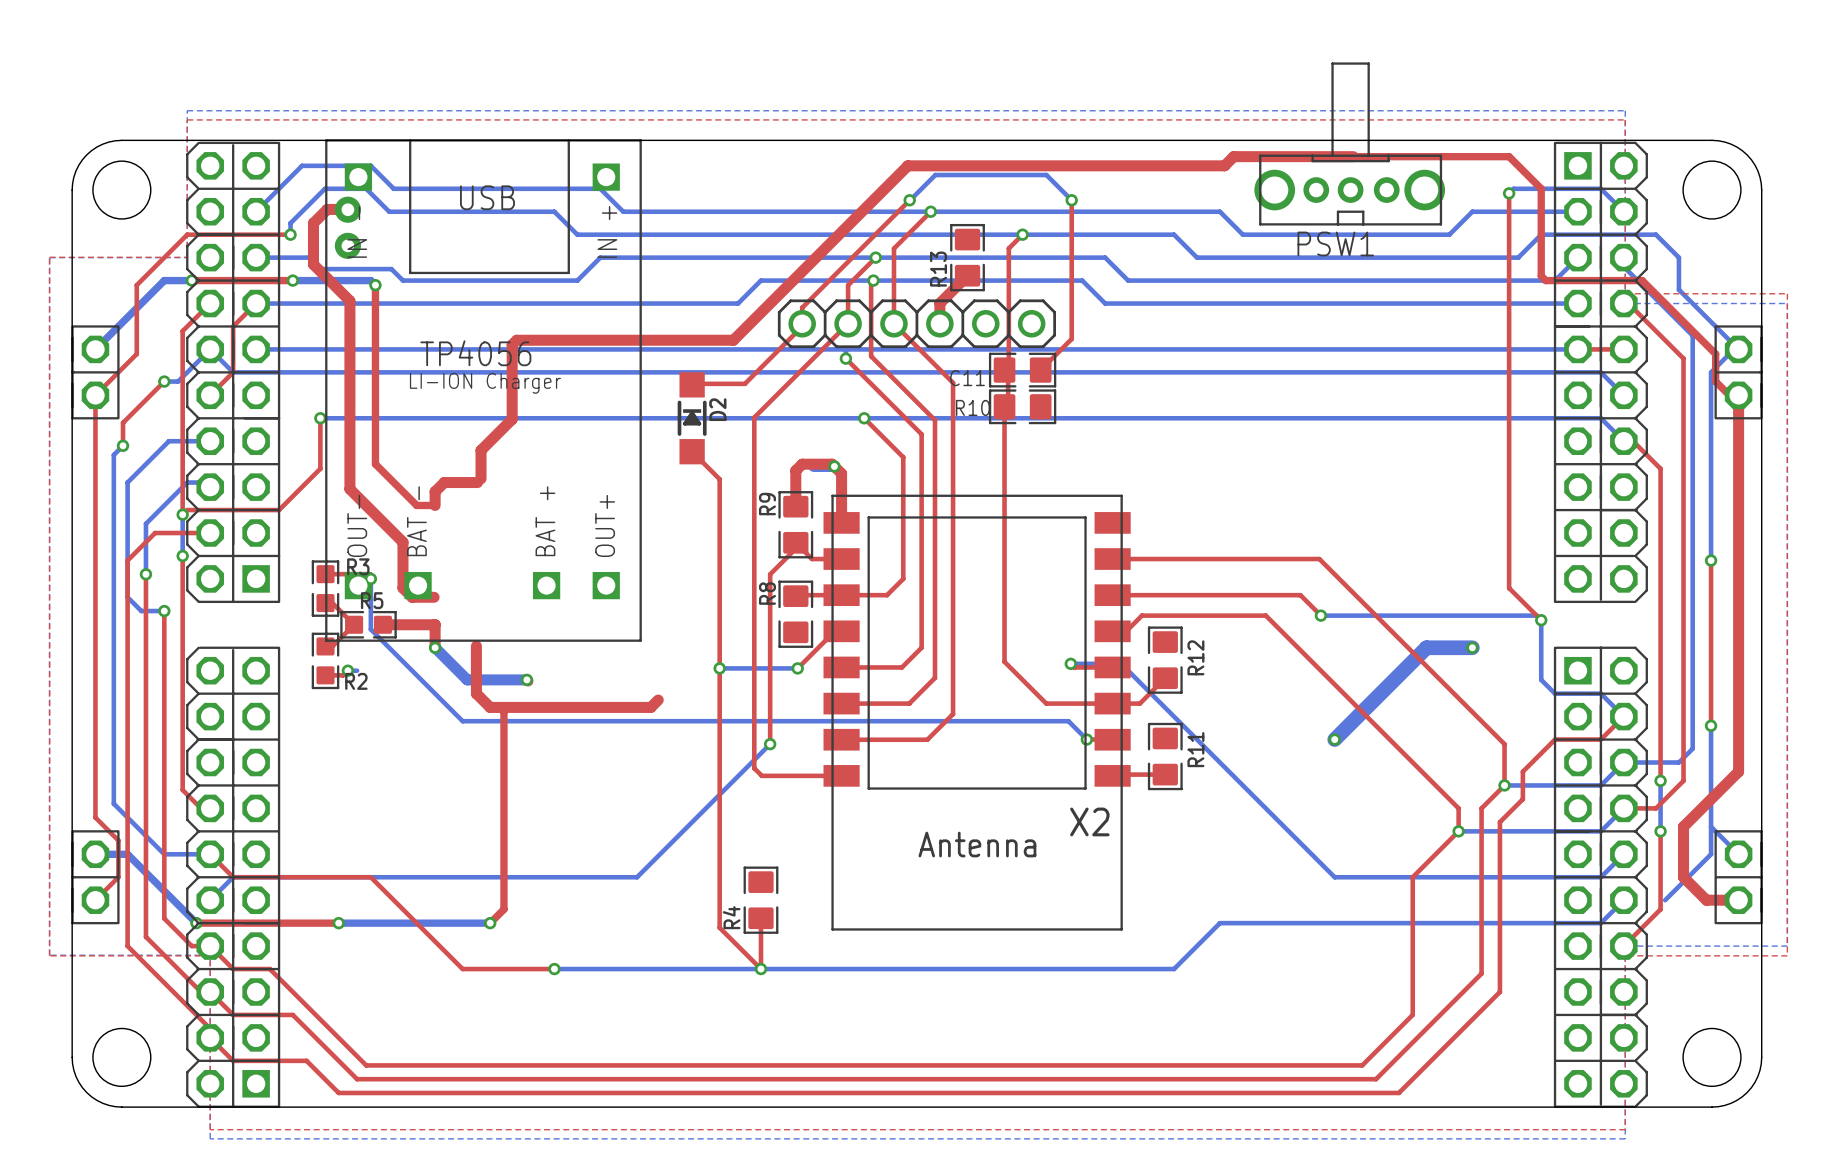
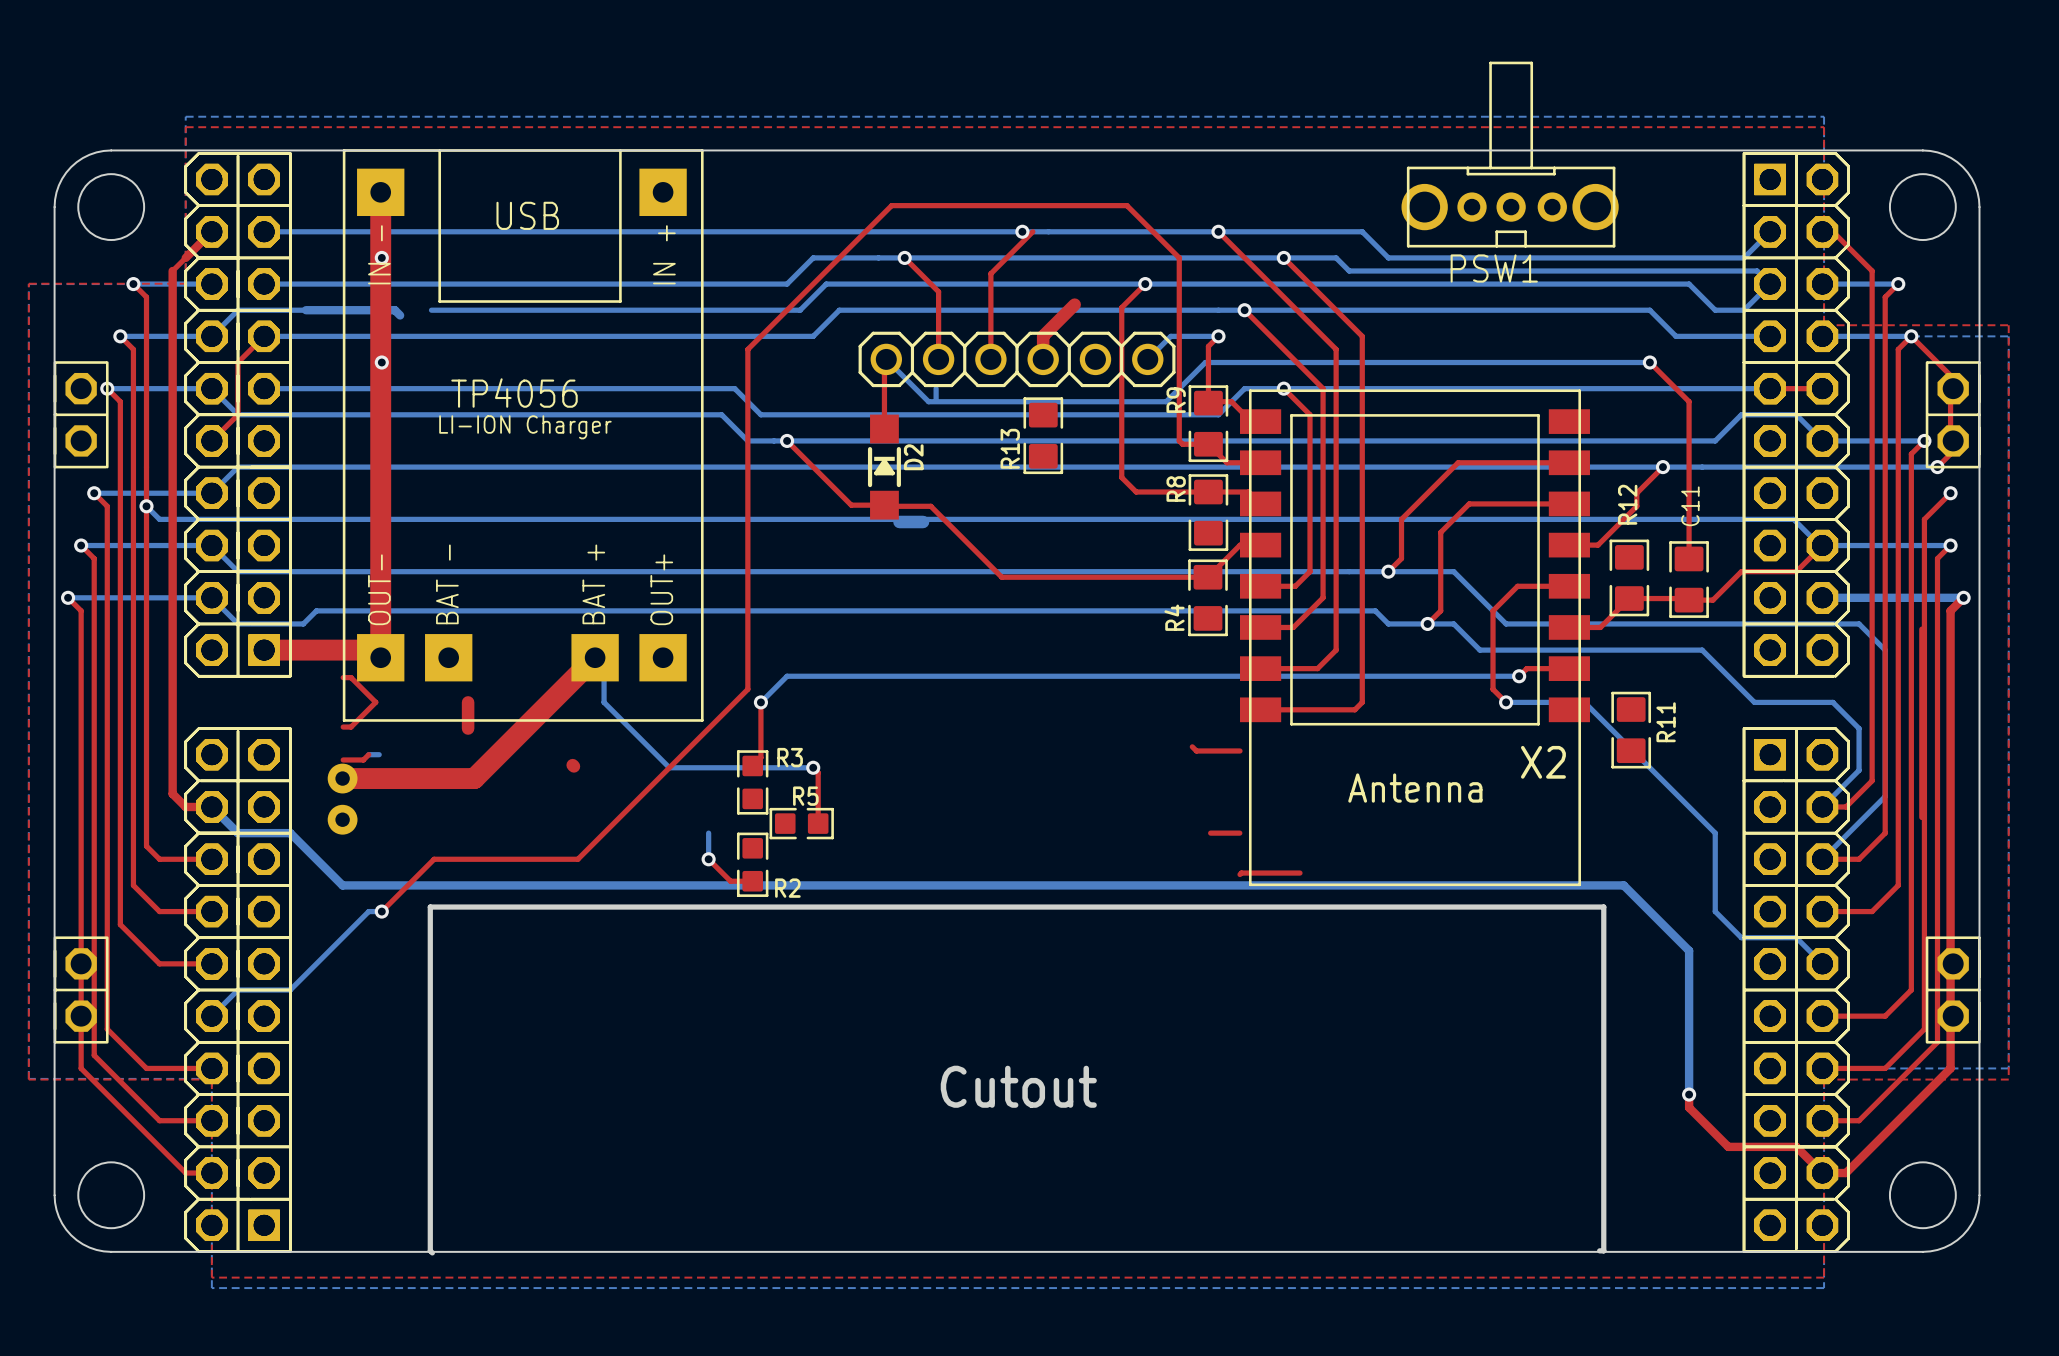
part footprint: [325, 139, 642, 642] -> [342, 149, 704, 722]
top track: none -> (380, 192) (380, 657) (373, 650) (264, 650)
top track: (1509, 193) (1509, 588) (1541, 620) -> none
bottom track: (1509, 193) (1513, 188) (1600, 188) (1623, 211) -> none
via: (1509, 193) -> none
top track: (909, 200) (802, 307) (802, 326) (744, 383) (692, 384) -> none
bottom track: (909, 200) (935, 175) (1046, 175) (1071, 200) -> none
via: (909, 200) -> none
top track: (1071, 200) (1071, 339) (1040, 370) -> none
via position: (1071, 200) -> (1218, 231)
top track: (347, 209) (327, 209) (313, 223) (313, 264) (349, 300) (349, 489) (402, 542) (402, 588) (412, 597) (434, 597) -> none
bottom track: (256, 211) (302, 165) (370, 165) (393, 188) (600, 188) (623, 211) -> none
bottom track: (389, 211) (366, 188) (324, 188) (290, 223) (290, 234) -> (415, 231) (264, 231)
bottom track: (554, 211) (577, 234) (738, 234) -> (604, 231) (682, 231)
via: none -> (1022, 231)
via: (930, 211) -> none
bottom track: (1577, 211) (1472, 211) (1449, 234) -> (1728, 257) (1623, 257)
part: (347, 227) -> none
top track: (187, 234) (290, 234) -> (185, 257) (211, 231)
via: (290, 234) -> none
via: none -> (381, 257)
via: none -> (904, 257)
top track: (1022, 234) (1008, 248) (1008, 278) -> (1145, 284) (1121, 307)
via position: (1022, 234) -> (1145, 284)
top track: none -> (1283, 257) (1362, 336) (1362, 702) (1354, 709) (1260, 709)
via: none -> (1283, 257)
bottom track: (1174, 234) (1197, 257) -> (1231, 284) (1336, 284)
bottom track: none -> (1310, 257) (1336, 257) (1349, 270) (1757, 270) (1770, 284)
bottom track: (1541, 234) (1518, 257) (1506, 257) -> none
bottom track: (1555, 234) (1655, 234) (1678, 257) (1678, 289) (1738, 349) (1734, 349) (1711, 372) (1711, 560) -> (1744, 257) (1770, 231)
top track: (175, 246) (136, 285) (136, 354) (95, 395) (95, 544) -> (172, 270) (172, 793) (185, 806) (211, 806)
top track: none -> (133, 284) (146, 297) (146, 846) (159, 859) (211, 859)
bottom track: none -> (133, 284) (211, 284)
via: none -> (133, 284)
bottom track: (308, 257) (320, 269) (391, 269) (402, 280) -> (324, 284) (656, 284)
bottom track: (600, 257) (577, 280) -> (826, 284) (800, 310) (630, 310)
bottom track: (715, 257) (749, 257) -> (787, 284) (813, 257)
top track: (875, 257) (848, 285) -> (904, 257) (938, 291) (938, 315)
via: (875, 257) -> none
R13 position: (967, 257) -> (1043, 435)
bottom track: (1105, 257) (1128, 280) -> (1205, 310) (1257, 310)
bottom track: (1623, 257) (1623, 266) (1692, 335) (1692, 748) (1678, 762) (1623, 762) (1600, 785) (1504, 785) -> (1822, 284) (1898, 284)
top track: none -> (1898, 284) (1885, 297) (1885, 833) (1859, 859) (1822, 859)
via: none -> (1898, 284)
top track: (191, 280) (292, 280) -> none
bottom track: (191, 280) (164, 280) (95, 349) -> none
via: (191, 280) -> none
bottom track: none -> (306, 310) (238, 310) (211, 336) (120, 336)
via: (292, 280) -> none
top track: (873, 280) (871, 282) (871, 356) (935, 420) (935, 677) (909, 703) (841, 703) -> none
via: (873, 280) -> none
bottom track: (1082, 280) (1105, 303) (1495, 303) -> (1649, 310) (1676, 336)
via: none -> (1244, 310)
bottom track: (1472, 280) (1529, 280) -> (1689, 284) (1715, 310)
top track: (375, 285) (375, 464) (416, 505) (435, 505) (435, 491) (444, 482) (477, 482) -> none
via: (375, 285) -> none
via: none -> (120, 336)
top track: (210, 303) (182, 331) (182, 514) (187, 510) (279, 510) (320, 468) (320, 418) -> none
top track: none -> (1218, 336) (1208, 346) (1208, 403) (1231, 401) (1251, 421) (1260, 421)
bottom track: none -> (1218, 336) (1170, 336) (1147, 359)
via: none -> (1218, 336)
top track: (1623, 303) (1628, 303) (1683, 358) (1683, 780) (1655, 808) -> (1937, 467) (1950, 454) (1950, 375) (1911, 336) (1898, 349) (1898, 885) (1872, 911) (1859, 911)
bottom track: none -> (1822, 336) (1911, 336)
via: none -> (1911, 336)
top track: none -> (886, 359) (884, 361) (884, 429)
bottom track: none -> (886, 359) (928, 401) (1166, 401) (1205, 362) (1649, 362)
top track: (848, 323) (754, 417) (754, 768) (761, 775) (841, 775) -> none
top track: (893, 323) (953, 382) (953, 714) (927, 739) (841, 739) -> none
via: none -> (381, 362)
top track: none -> (1649, 362) (1689, 401) (1689, 558)
via: none -> (1649, 362)
via: none -> (107, 388)
bottom track: (210, 349) (178, 381) (164, 381) -> (211, 388) (107, 388)
bottom track: (669, 349) (1116, 349) -> (1218, 414) (1244, 388)
top track: none -> (1283, 388) (1310, 414) (1310, 571) (1295, 586) (1260, 586)
via: none -> (1283, 388)
top track: (845, 358) (921, 434) (921, 647) (901, 667) (841, 667) -> none
via: (845, 358) -> none
top track: (1008, 365) (1004, 370) (1008, 373) (1008, 403) (1004, 406) (1004, 661) (1046, 703) (1139, 703) (1165, 678) -> (1121, 407) (1121, 477) (1136, 492) (1248, 492) (1260, 503)
C11 rotation: 0° (1022, 370) -> 90° clockwise (1689, 579)
C11 position: (1022, 370) -> (1689, 579)
part: none -> (238, 414)
bottom track: (657, 372) (692, 372) -> (734, 388) (760, 414)
bottom track: (1093, 372) (1552, 372) -> (721, 414) (747, 440) (1715, 440) (1741, 414)
part: none -> (1796, 414)
top track: (164, 381) (123, 422) (123, 445) -> none
via: (164, 381) -> none
top track: none -> (787, 440) (851, 505) (930, 506) (1001, 577) (1207, 577) (1240, 545) (1260, 545)
via: none -> (787, 440)
bottom track: none -> (1822, 440) (1924, 440)
top track: none -> (1924, 440) (1911, 454) (1911, 990) (1885, 1016) (1822, 1016)
via: none -> (1924, 440)
R10: (1022, 406) -> none
top track: none -> (1260, 462) (1226, 462) (1208, 444) (1182, 444) (1179, 440) (1179, 257) (1126, 205) (891, 205) (747, 349) (747, 689) (577, 859) (434, 859) (381, 911)
top track: none -> (1569, 462) (1458, 462) (1401, 519) (1401, 558) (1388, 571)
bottom track: none -> (337, 467) (238, 467) (211, 493)
via: (320, 418) -> none
D2 position: (692, 418) -> (884, 467)
top track: (864, 418) (903, 457) (903, 578) (887, 595) (795, 596) -> none
via: (864, 418) -> none
top track: none -> (1662, 467) (1636, 493) (1636, 506) (1598, 545) (1569, 545)
via: none -> (1662, 467)
bottom track: (1600, 418) (1623, 441) -> (1796, 467) (1937, 467)
via: none -> (1937, 467)
top track: none -> (94, 493) (107, 506) (107, 948)
via: none -> (94, 493)
bottom track: (168, 441) (127, 482) (127, 597) (141, 611) (164, 611) -> (164, 493) (94, 493)
top track: (1623, 441) (1633, 441) (1660, 468) (1660, 780) -> none
via: none -> (1950, 493)
bottom track: (123, 445) (113, 454) (113, 803) (164, 854) (210, 854) -> none
via: (123, 445) -> none
top track: none -> (1569, 503) (1469, 503) (1440, 532) (1440, 610) (1427, 623)
top track: (692, 451) (719, 479) (719, 927) (760, 969) (760, 918) -> none
bottom track: none -> (146, 506) (159, 519) (1793, 519) (1819, 545) (1950, 545)
via: none -> (146, 506)
via: (834, 466) -> none
top track: (481, 478) (481, 450) (512, 419) (512, 344) (516, 340) (733, 340) (907, 165) (1224, 165) (1233, 156) (1509, 156) (1541, 188) (1541, 275) (1545, 280) (1642, 280) (1715, 354) (1715, 381) (1729, 395) (1738, 395) (1738, 771) (1683, 826) (1683, 877) (1706, 900) (1738, 900) -> none
bottom track: none -> (81, 545) (211, 545) (238, 571) (1453, 571) (1506, 623) (1859, 623) (1885, 650) (1885, 796) (1822, 859)
via: none -> (81, 545)
bottom track: (210, 487) (205, 482) (187, 482) (145, 523) (145, 574) -> none
top track: none -> (1822, 545) (1796, 571) (1741, 571) (1712, 600) (1629, 598) (1600, 627) (1569, 627)
top track: none -> (1950, 545) (1937, 558) (1937, 1042) (1859, 1120) (1822, 1120)
via: none -> (1950, 545)
top track: (795, 506) (795, 470) (802, 464) (832, 464) (841, 473) (841, 522) -> none
via: none -> (1388, 571)
bottom track: (182, 514) (182, 555) -> none
via: (182, 514) -> none
top track: none -> (1569, 586) (1517, 586) (1493, 610) (1493, 689) (1506, 702)
R9 position: (795, 524) -> (1208, 423)
top track: none -> (68, 597) (81, 610)
via: none -> (68, 597)
top track: (210, 533) (155, 533) (127, 560) (127, 946) (210, 1028) (210, 1037) (233, 1060) (306, 1060) (338, 1092) (1398, 1092) (1499, 991) (1499, 822) (1522, 799) (1522, 771) (1555, 739) (1600, 739) (1623, 716) -> (1822, 231) (1832, 231) (1872, 270) (1872, 780) (1845, 806) (1822, 806)
bottom track: none -> (1822, 597) (1963, 597)
top track: none -> (1963, 597) (1950, 610) (1950, 1068) (1845, 1173) (1822, 1173) (1796, 1146) (1728, 1146) (1689, 1107) (1689, 1094)
via: none -> (1963, 597)
top track: (182, 555) (182, 790) (201, 808) -> (120, 336) (133, 349) (133, 885) (159, 911) (201, 911)
via: (182, 555) -> none
via: none -> (1427, 623)
top track: (841, 559) (812, 559) (795, 542) (795, 548) (770, 574) (770, 744) -> none
top track: (1159, 559) (1319, 559) (1504, 744) (1504, 785) (1481, 808) (1481, 973) (1376, 1079) (357, 1079) (292, 1014) (233, 1014) (210, 991) -> (1293, 627) (1323, 597) (1323, 388) (1244, 310)
via: (1711, 560) -> none
top track: (145, 574) (145, 936) (201, 991) -> (81, 545) (94, 558) (94, 1055) (159, 1120) (201, 1120)
via: (145, 574) -> none
bottom track: (370, 578) (370, 629) (462, 721) (1068, 721) (1086, 739) -> none
via: (370, 578) -> none
top track: none -> (595, 657) (474, 778) (342, 778)
bottom track: none -> (595, 657) (604, 666) (604, 702) (669, 767) (813, 767)
R3 position: (325, 588) -> (752, 782)
top track: (1180, 595) (1300, 595) (1320, 615) -> (1317, 668) (1336, 650) (1336, 349) (1218, 231)
top track: none -> (1569, 668) (1526, 668) (1519, 676)
bottom track: none -> (1519, 676) (787, 676) (760, 702)
via: none -> (1519, 676)
top track: (164, 611) (164, 918) (191, 946) -> none
via: (164, 611) -> none
R8 position: (795, 614) -> (1208, 512)
bottom track: (1320, 615) (1536, 615) (1541, 620) (1541, 679) (1555, 693) (1600, 693) (1623, 716) -> (68, 597) (211, 597) (238, 623) (303, 623) (316, 610) (1375, 610) (1388, 623) (1453, 623) (1479, 650) (1702, 650) (1754, 702) (1832, 702) (1859, 728) (1859, 770) (1822, 806)
via: (1320, 615) -> none
via: (1541, 620) -> none
R5 position: (368, 624) -> (801, 823)
top track: (382, 624) (435, 624) -> none
top track: none -> (760, 702) (760, 757) (752, 765)
via: none -> (760, 702)
via: none -> (1506, 702)
top track: (841, 631) (834, 631) (797, 668) -> none
top track: (1112, 631) (1126, 631) (1141, 615) (1265, 615) (1458, 808) (1458, 831) (1412, 877) (1412, 1014) (1362, 1065) (366, 1065) (269, 969) (233, 969) (210, 946) -> none
top track: (476, 646) (476, 693) (490, 707) (650, 707) (658, 700) -> none
bottom track: (435, 647) (467, 679) (526, 679) -> none
via: (435, 647) -> none
bottom track: (1472, 647) (1426, 647) (1334, 739) -> none
via: (1472, 647) -> none
R12 name position: R12 (1195, 657) -> R12 (1627, 504)
R2 position: (325, 660) -> (752, 864)
R12 position: (1165, 660) -> (1629, 577)
bottom track: (1070, 663) (1121, 663) (1334, 877) (1600, 877) (1623, 854) -> none
via: (1070, 663) -> none
bottom track: (719, 668) (797, 668) -> none
via position: (719, 668) -> (813, 767)
via: (797, 668) -> none
via: (347, 670) -> none
via: (526, 679) -> none
top track: none -> (813, 767) (818, 772) (818, 823)
top track: (499, 707) (503, 712) (503, 909) (490, 923) -> none
part: none -> (342, 799)
X2 position: (977, 712) -> (1414, 637)
bottom track: none -> (211, 806) (238, 833) (290, 833) (342, 885) (1623, 885) (1689, 950) (1689, 1094)
bottom track: (1711, 725) (1711, 854) (1665, 900) -> none
via: (1711, 725) -> none
bottom track: none -> (708, 833) (708, 859)
via: (1086, 739) -> none
via: (1334, 739) -> none
bottom track: (770, 744) (637, 877) (279, 877) -> (381, 911) (368, 911) (290, 990)
via: (770, 744) -> none
R11 position: (1165, 756) -> (1631, 730)
top track: none -> (708, 859) (730, 881) (752, 881)
via: none -> (708, 859)
bottom track: (1660, 780) (1660, 831) -> none
via: (1660, 780) -> none
via: (1504, 785) -> none
via: none -> (381, 911)
bottom track: (1623, 808) (1600, 831) -> (1822, 963) (1796, 937)
top track: (95, 817) (118, 840) -> (81, 922) (81, 1068) (185, 1173) (211, 1173)
bottom track: (1711, 826) (1738, 854) -> none
bottom track: (1458, 831) (1552, 831) -> (1506, 702) (1584, 702) (1715, 833) (1715, 911) (1741, 937)
via: (1458, 831) -> none
top track: (1660, 831) (1660, 909) (1623, 946) -> (1950, 493) (1924, 519) (1924, 1029) (1885, 1068) (1822, 1068)
via: (1660, 831) -> none
bottom track: (95, 854) (127, 854) (196, 923) -> none
top track: (210, 854) (233, 877) (370, 877) (462, 969) (554, 969) -> (211, 963) (159, 963) (120, 924) (120, 401) (107, 388)
top track: (118, 877) (95, 900) -> (107, 990) (107, 1029) (146, 1068) (190, 1068)
part: none -> (238, 990)
part: none -> (1796, 990)
R4 position: (760, 900) -> (1207, 597)
bottom track: (1623, 900) (1600, 923) (1219, 923) (1174, 969) (554, 969) -> none
top track: (196, 923) (338, 923) -> none
via: (196, 923) -> none
bottom track: (338, 923) (490, 923) -> none
via: (338, 923) -> none
via: (490, 923) -> none
text: none -> Cutout (1018, 1086)
via: (554, 969) -> none
via: (760, 969) -> none
via: none -> (1689, 1094)
board edge: none -> (1599, 1250) (1603, 1250) (1603, 907) (430, 907) (430, 1250) (432, 1252)

